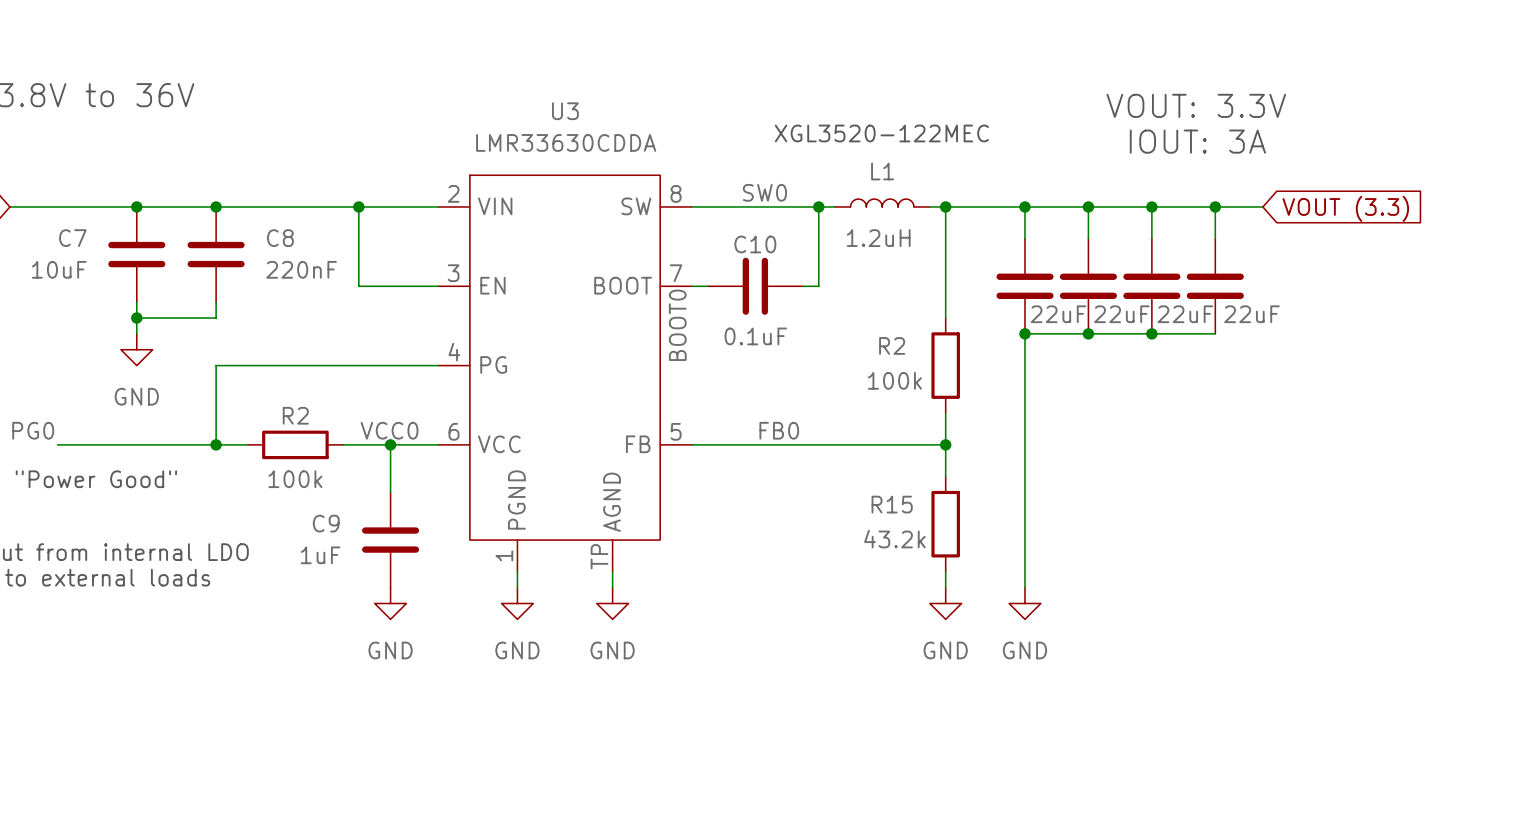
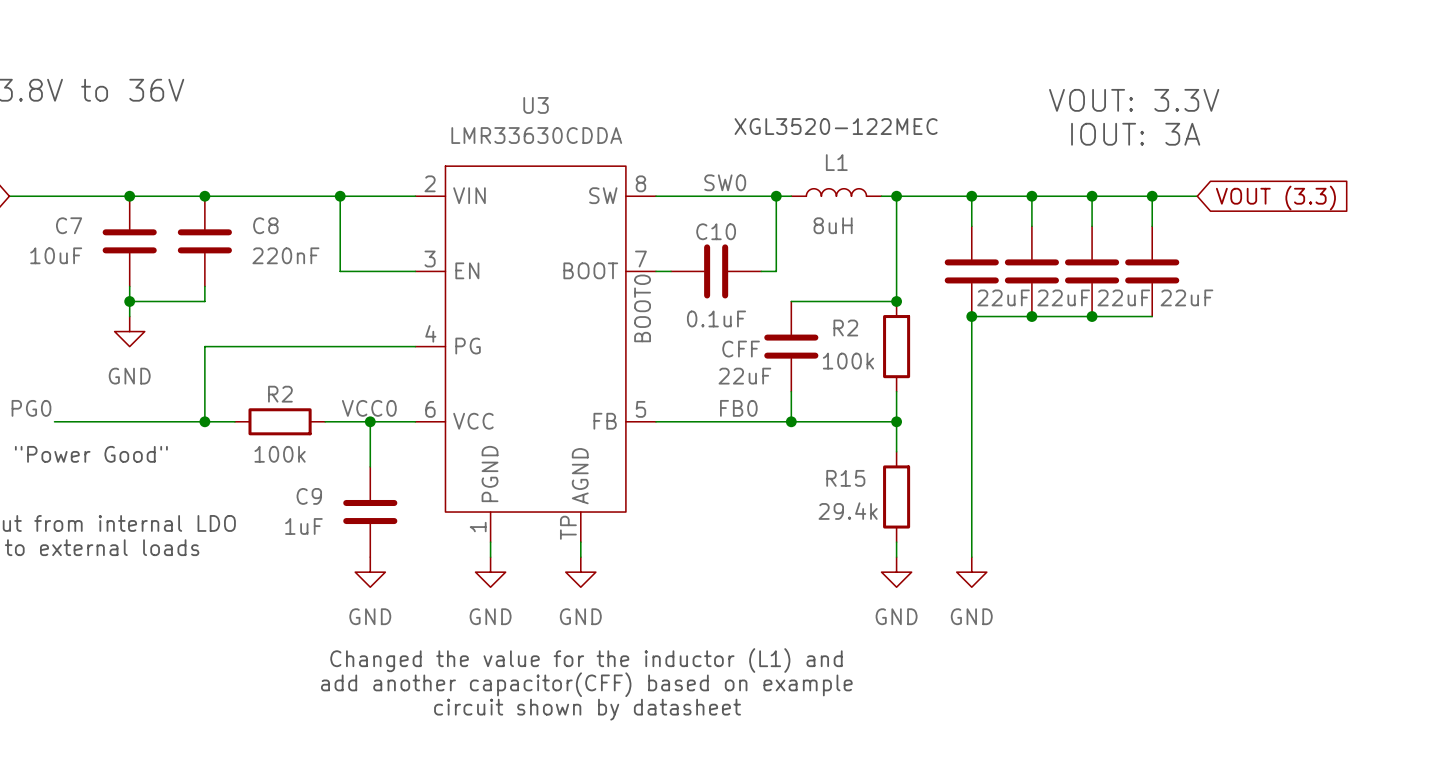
L1 value: 1.2uH (878, 238) -> 8uH (833, 225)
wire: none -> (791, 301) (896, 301)
junction: none -> (896, 301)
CFF: none -> 22uF (791, 346)
wire: none -> (791, 391) (791, 421)
junction: none -> (791, 421)
R15 value: 43.2k (894, 539) -> 29.4k (848, 511)
text: none -> Changed the value for the inductor (L1) and (586, 660)
text: none -> add another capacitor(CFF) based on example (586, 684)
text: none -> circuit shown by datasheet (587, 709)

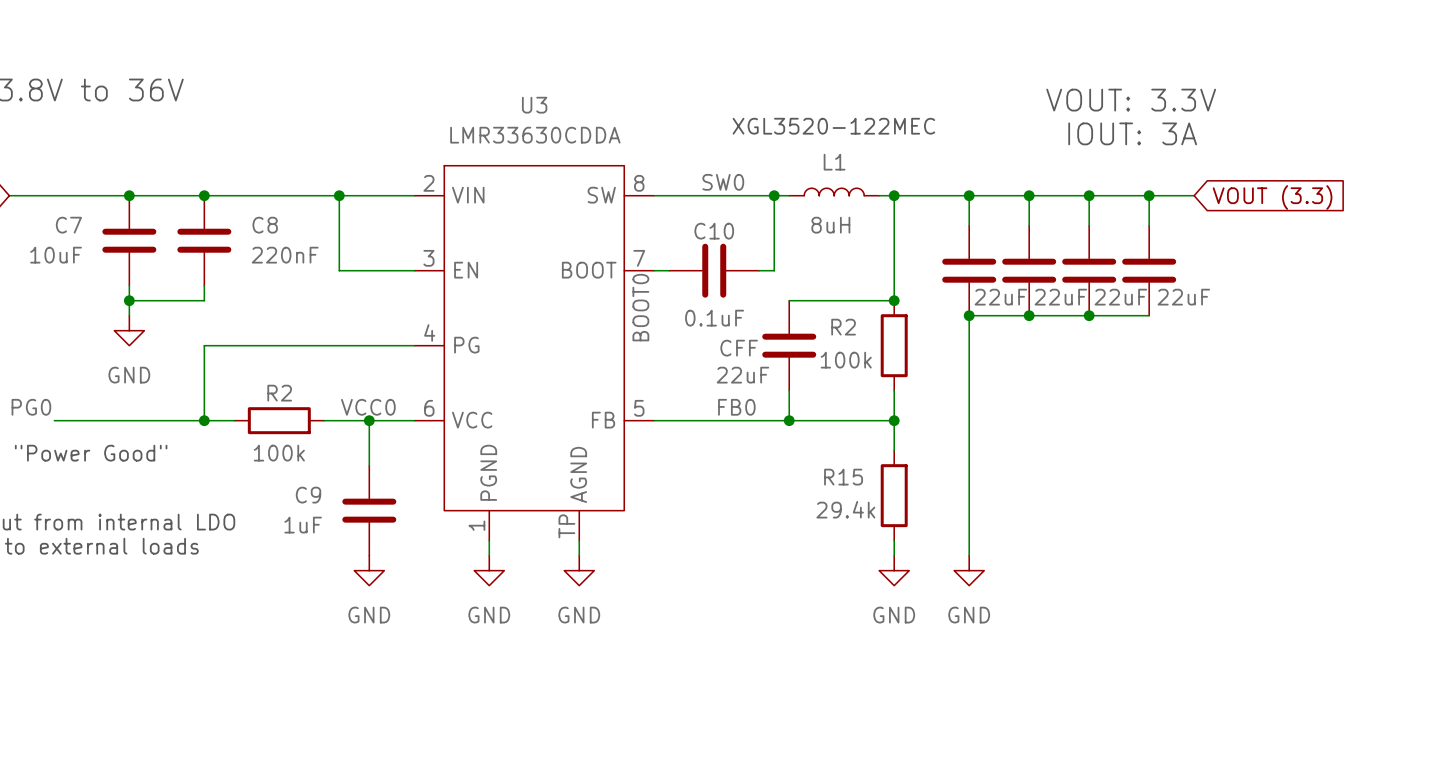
text: Changed the value for the inductor (L1) and (586, 660) -> none
text: add another capacitor(CFF) based on example (586, 684) -> none
text: circuit shown by datasheet (587, 709) -> none

